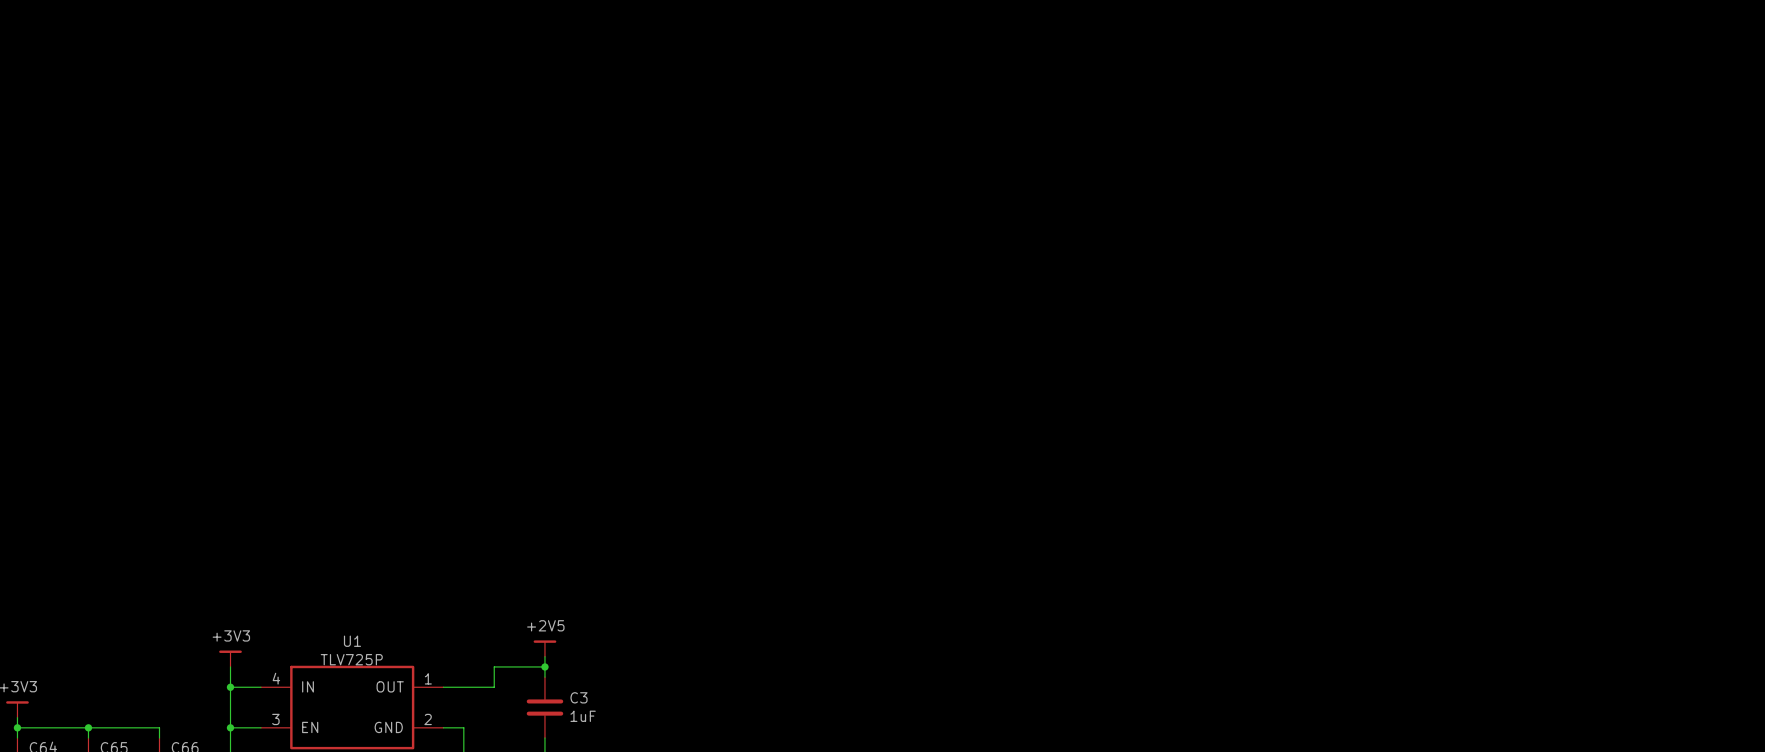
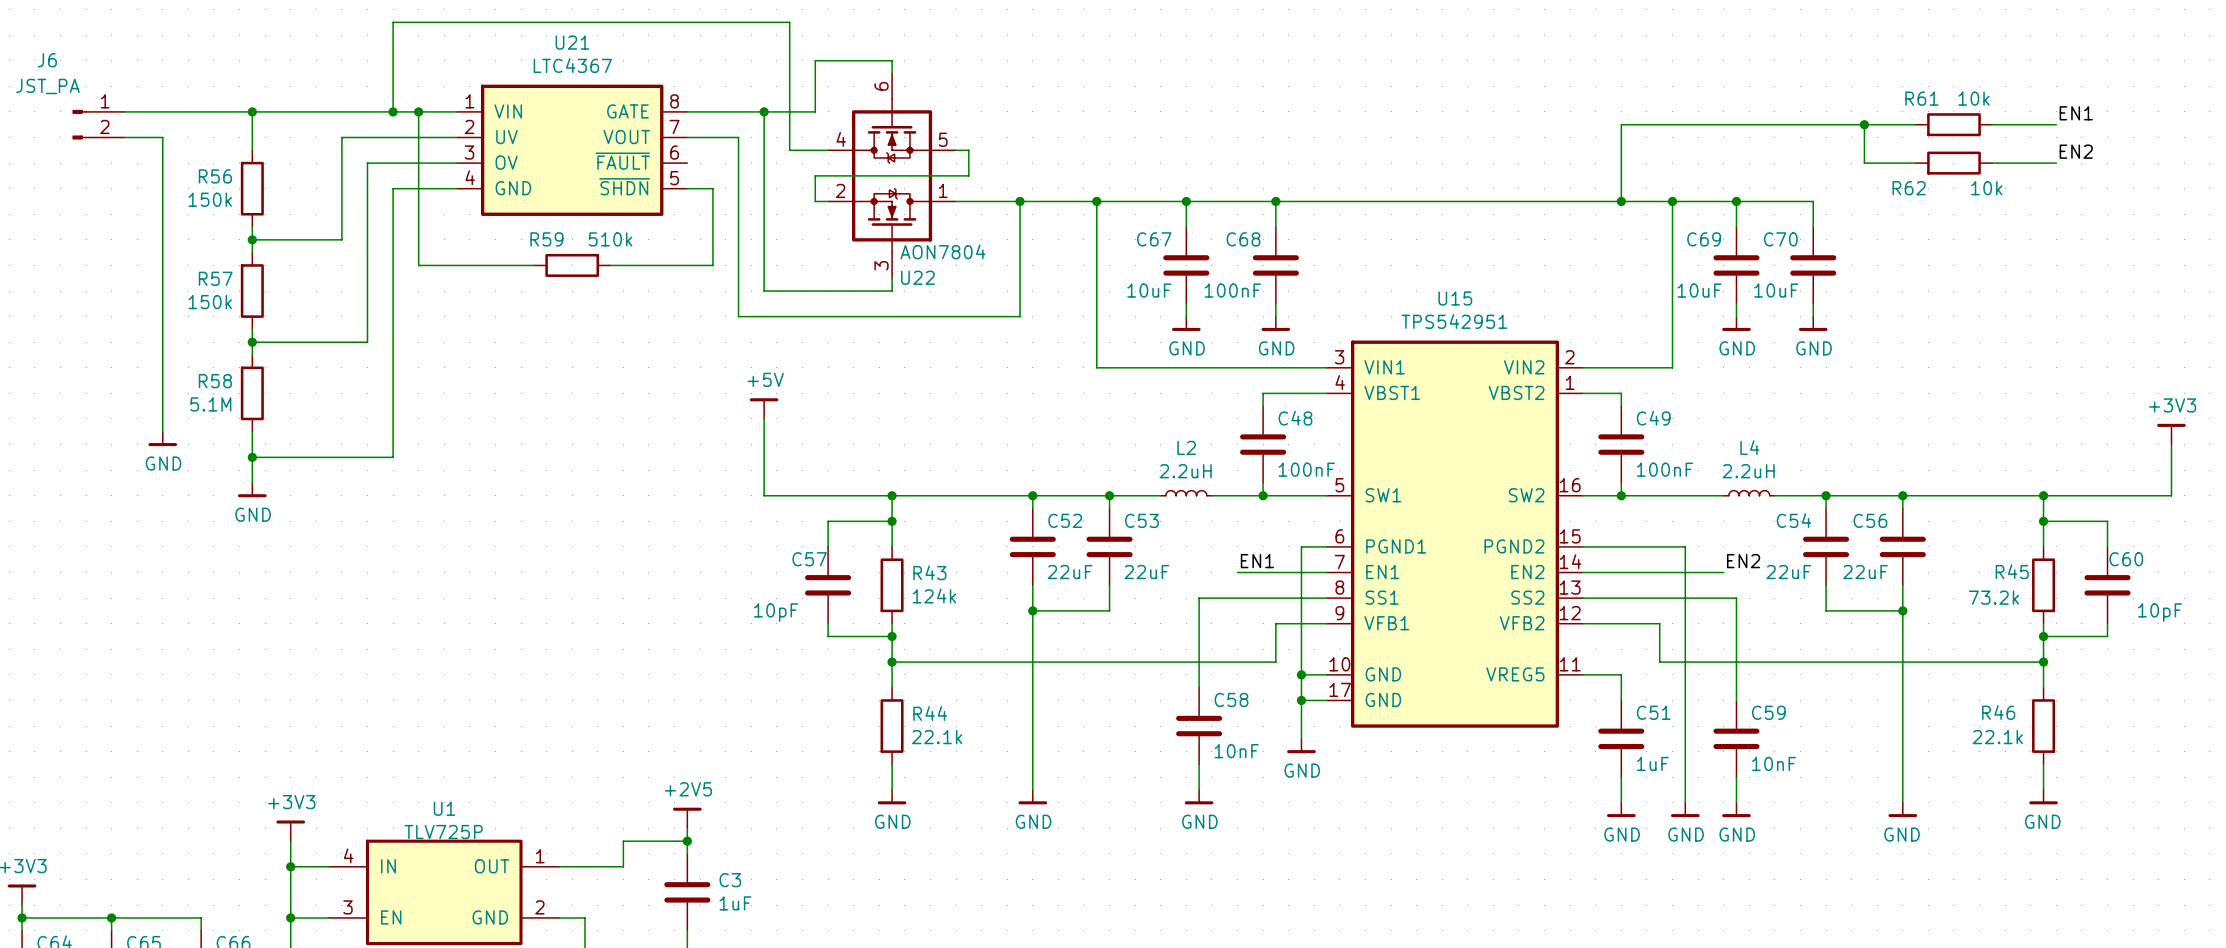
wire: none -> (892, 73) (892, 60) (815, 60) (815, 111) (687, 111)
wire: none -> (124, 111) (457, 111)
wire: none -> (252, 111) (252, 150)
junction: none -> (252, 111)
wire: none -> (393, 111) (393, 22) (789, 22) (789, 150) (828, 150)
junction: none -> (393, 111)
wire: none -> (418, 111) (418, 265) (533, 265)
junction: none -> (418, 111)
wire: none -> (764, 111) (764, 291) (892, 291) (892, 278)
junction: none -> (764, 111)
label: none -> EN1 (2076, 113)
J6: none -> JST_PA (98, 124)
wire: none -> (1864, 124) (1864, 163) (1915, 163)
junction: none -> (1864, 124)
wire: none -> (1915, 124) (1621, 124) (1621, 201)
R61: none -> 10k (1953, 124)
wire: none -> (1992, 124) (2056, 124)
wire: none -> (124, 137) (162, 137) (162, 431)
wire: none -> (457, 137) (341, 137) (341, 239) (252, 239)
wire: none -> (687, 137) (738, 137) (738, 316) (1019, 316) (1019, 201)
U21: none -> LTC4367 (572, 150)
wire: none -> (956, 150) (968, 150) (968, 175) (815, 175) (815, 201) (828, 201)
label: none -> EN2 (2076, 151)
wire: none -> (457, 163) (367, 163) (367, 342) (252, 342)
R62: none -> 10k (1953, 163)
wire: none -> (1992, 163) (2056, 163)
U22: none -> AON7804 (892, 175)
R56: none -> 150k (252, 188)
wire: none -> (457, 188) (393, 188) (393, 457) (252, 457)
wire: none -> (687, 188) (712, 188) (712, 265) (610, 265)
wire: none -> (956, 201) (1813, 201) (1813, 227)
junction: none -> (1019, 201)
wire: none -> (1096, 201) (1096, 367) (1327, 367)
junction: none -> (1096, 201)
wire: none -> (1186, 201) (1186, 227)
junction: none -> (1186, 201)
wire: none -> (1275, 201) (1275, 227)
junction: none -> (1275, 201)
junction: none -> (1621, 201)
wire: none -> (1672, 201) (1672, 367) (1582, 367)
junction: none -> (1672, 201)
wire: none -> (1736, 201) (1736, 227)
junction: none -> (1736, 201)
wire: none -> (252, 227) (252, 252)
junction: none -> (252, 239)
R59: none -> 510k (572, 265)
C67: none -> 10uF (1186, 265)
C68: none -> 100nF (1275, 265)
C69: none -> 10uF (1736, 265)
C70: none -> 10uF (1813, 265)
R57: none -> 150k (252, 291)
wire: none -> (1186, 303) (1186, 316)
wire: none -> (1275, 303) (1275, 316)
wire: none -> (1736, 303) (1736, 316)
wire: none -> (1813, 303) (1813, 316)
power symbol: none -> GND (1186, 323)
power symbol: none -> GND (1275, 323)
power symbol: none -> GND (1736, 323)
power symbol: none -> GND (1813, 323)
wire: none -> (252, 329) (252, 355)
junction: none -> (252, 342)
R58: none -> 5.1M (252, 393)
wire: none -> (1327, 393) (1263, 393) (1263, 406)
wire: none -> (1582, 393) (1621, 393) (1621, 406)
power symbol: none -> +5V (764, 408)
wire: none -> (764, 418) (764, 495) (1160, 495)
wire: none -> (252, 431) (252, 482)
power symbol: none -> +3V3 (2171, 434)
power symbol: none -> GND (162, 438)
C48: none -> 100nF (1263, 444)
C49: none -> 100nF (1621, 444)
wire: none -> (2171, 444) (2171, 495) (1774, 495)
junction: none -> (252, 457)
wire: none -> (1263, 482) (1263, 495)
wire: none -> (1621, 482) (1621, 495)
power symbol: none -> GND (252, 490)
L2: none -> 2.2uH (1186, 493)
L4: none -> 2.2uH (1749, 493)
wire: none -> (892, 495) (892, 546)
junction: none -> (892, 495)
wire: none -> (1032, 495) (1032, 508)
junction: none -> (1032, 495)
wire: none -> (1109, 495) (1109, 508)
junction: none -> (1109, 495)
wire: none -> (1211, 495) (1327, 495)
junction: none -> (1263, 495)
wire: none -> (1582, 495) (1723, 495)
junction: none -> (1621, 495)
wire: none -> (1826, 495) (1826, 508)
junction: none -> (1826, 495)
wire: none -> (1902, 495) (1902, 508)
junction: none -> (1902, 495)
wire: none -> (2043, 495) (2043, 546)
junction: none -> (2043, 495)
wire: none -> (892, 521) (828, 521) (828, 546)
junction: none -> (892, 521)
wire: none -> (2043, 521) (2107, 521) (2107, 546)
junction: none -> (2043, 521)
U15: none -> TPS542951 (1455, 534)
C52: none -> 22uF (1032, 546)
C53: none -> 22uF (1109, 546)
wire: none -> (1327, 546) (1301, 546) (1301, 738)
wire: none -> (1582, 546) (1685, 546) (1685, 802)
C54: none -> 22uF (1826, 546)
C56: none -> 22uF (1902, 546)
label: none -> EN1 (1257, 561)
label: none -> EN2 (1743, 561)
wire: none -> (1237, 572) (1327, 572)
wire: none -> (1582, 572) (1723, 572)
C57: none -> 10pF (828, 585)
R43: none -> 124k (892, 585)
wire: none -> (1032, 585) (1032, 790)
wire: none -> (1109, 585) (1109, 610) (1032, 610)
wire: none -> (1826, 585) (1826, 610) (1902, 610)
wire: none -> (1902, 585) (1902, 802)
R45: none -> 73.2k (2043, 585)
C60: none -> 10pF (2107, 585)
wire: none -> (1327, 598) (1199, 598) (1199, 687)
wire: none -> (1582, 598) (1736, 598) (1736, 700)
junction: none -> (1032, 610)
junction: none -> (1902, 610)
wire: none -> (828, 623) (828, 636) (892, 636)
wire: none -> (892, 623) (892, 687)
wire: none -> (1327, 623) (1275, 623) (1275, 662) (892, 662)
wire: none -> (1582, 623) (1659, 623) (1659, 662) (2043, 662)
wire: none -> (2043, 623) (2043, 687)
wire: none -> (2107, 623) (2107, 636) (2043, 636)
junction: none -> (892, 636)
junction: none -> (2043, 636)
junction: none -> (892, 662)
junction: none -> (2043, 662)
wire: none -> (1301, 674) (1327, 674)
junction: none -> (1301, 674)
wire: none -> (1582, 674) (1621, 674) (1621, 700)
wire: none -> (1301, 700) (1327, 700)
junction: none -> (1301, 700)
R44: none -> 22.1k (892, 726)
C58: none -> 10nF (1199, 726)
R46: none -> 22.1k (2043, 726)
C51: none -> 1uF (1621, 738)
C59: none -> 10nF (1736, 738)
power symbol: none -> GND (1301, 746)
wire: none -> (892, 764) (892, 790)
wire: none -> (1199, 764) (1199, 790)
wire: none -> (2043, 764) (2043, 790)
wire: none -> (1621, 777) (1621, 802)
wire: none -> (1736, 777) (1736, 802)
power symbol: none -> GND (892, 797)
power symbol: none -> GND (1032, 797)
power symbol: none -> GND (1199, 797)
power symbol: none -> GND (2043, 797)
power symbol: none -> GND (1621, 809)
power symbol: none -> GND (1685, 809)
power symbol: none -> GND (1736, 809)
power symbol: none -> GND (1902, 809)

